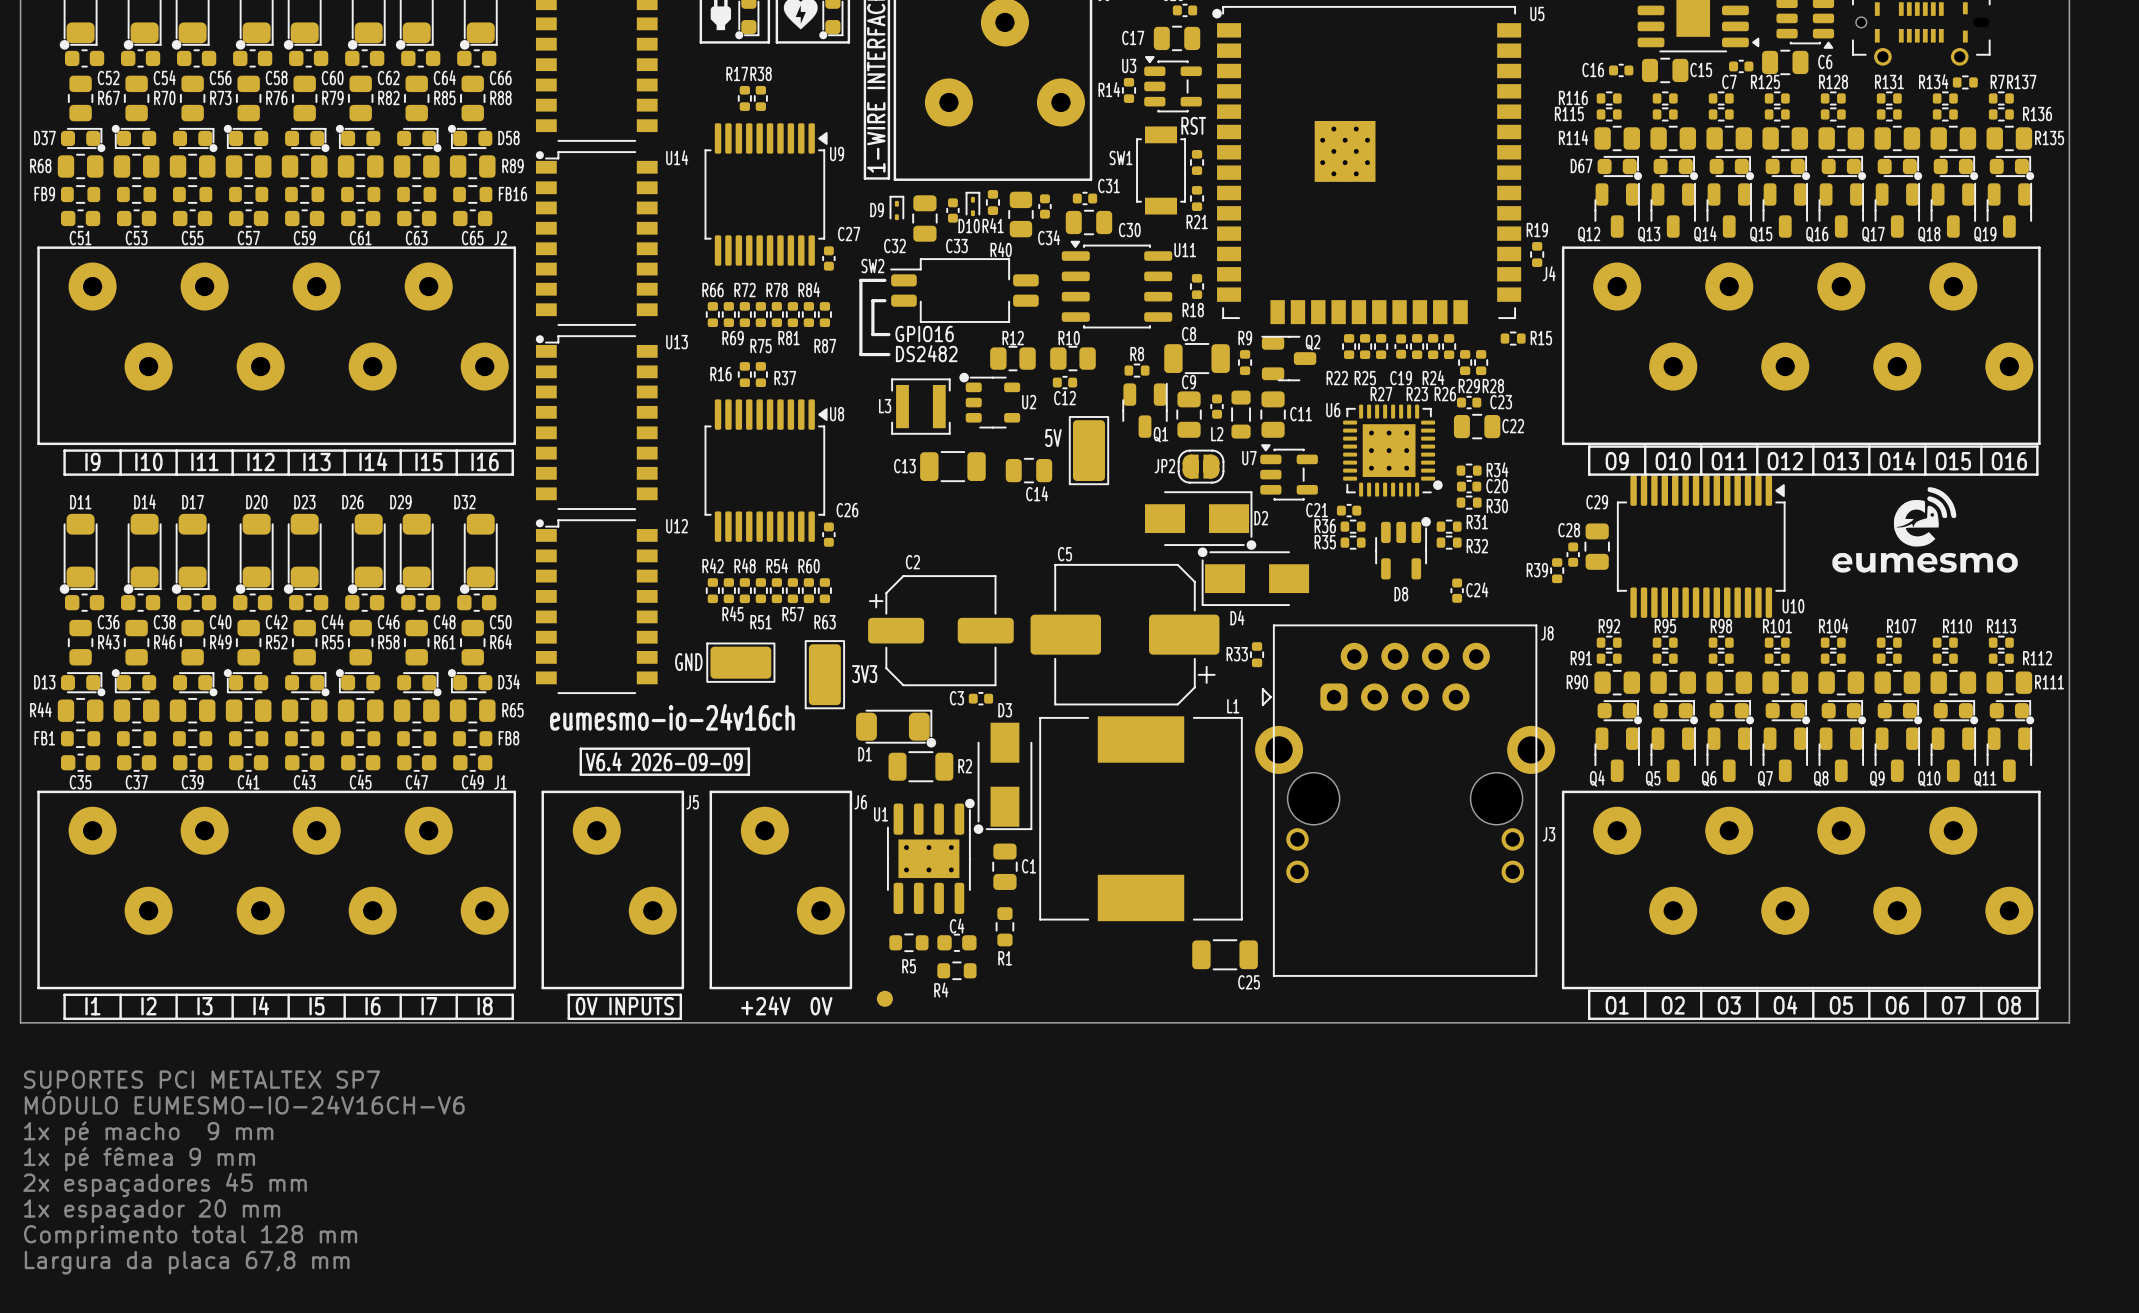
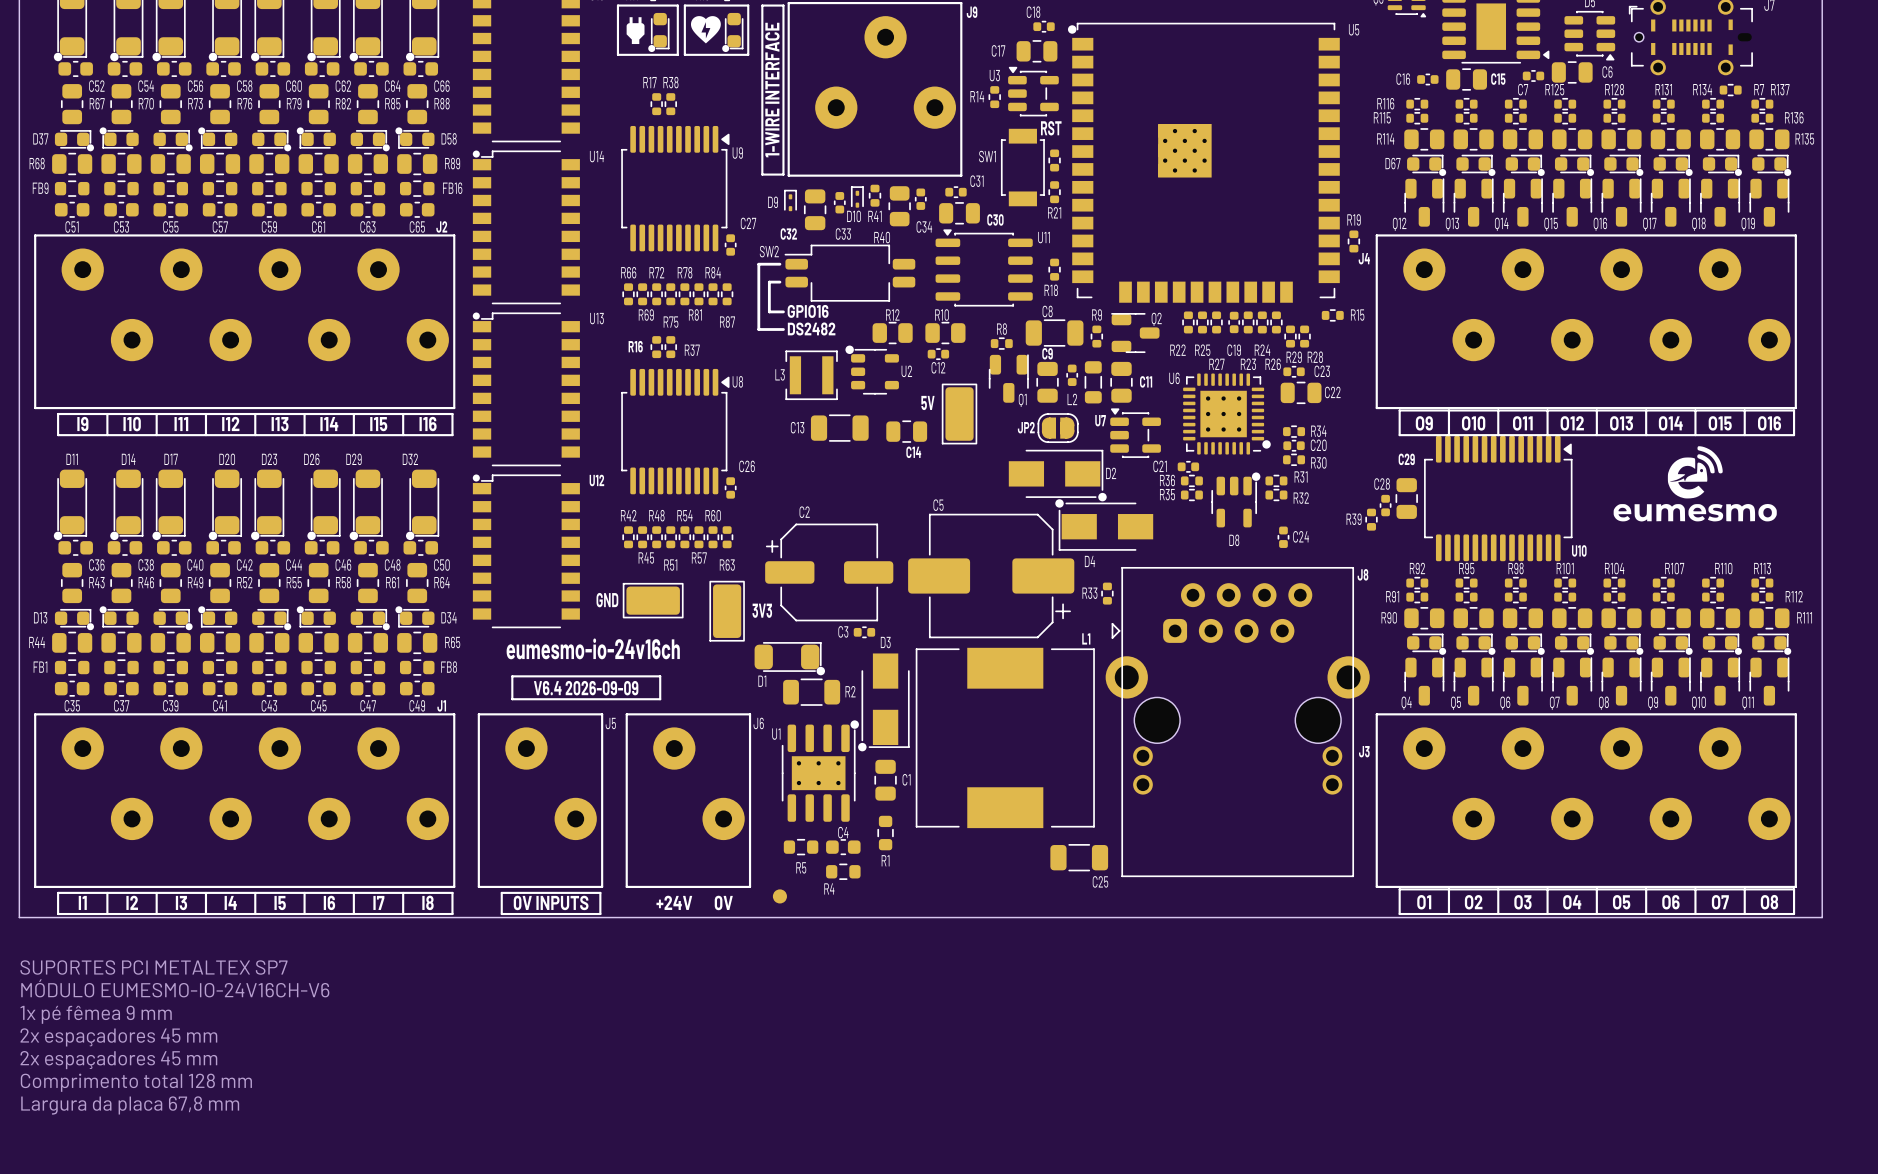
text: 1x pé macho 9 mm (148, 1133) -> 1x pé fêmea 9 mm (96, 1014)
text: 1x pé fêmea 9 mm (139, 1159) -> 2x espaçadores 45 mm (118, 1037)
text: 1x espaçador 20 mm (152, 1211) -> Comprimento total 128 mm (136, 1082)
text: Comprimento total 128 mm (190, 1236) -> Largura da placa 67,8 mm (130, 1105)
text: Largura da placa 67,8 mm (187, 1262) -> none

